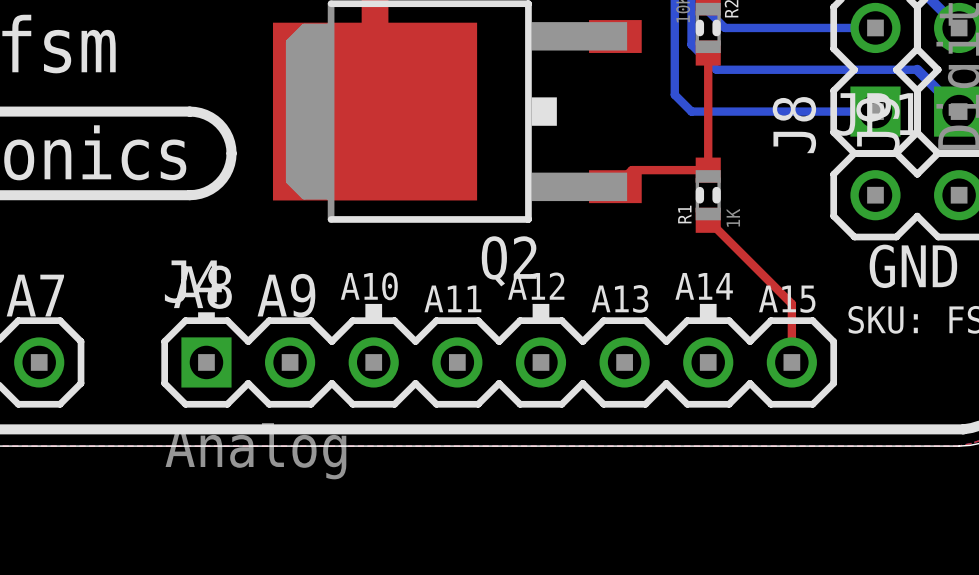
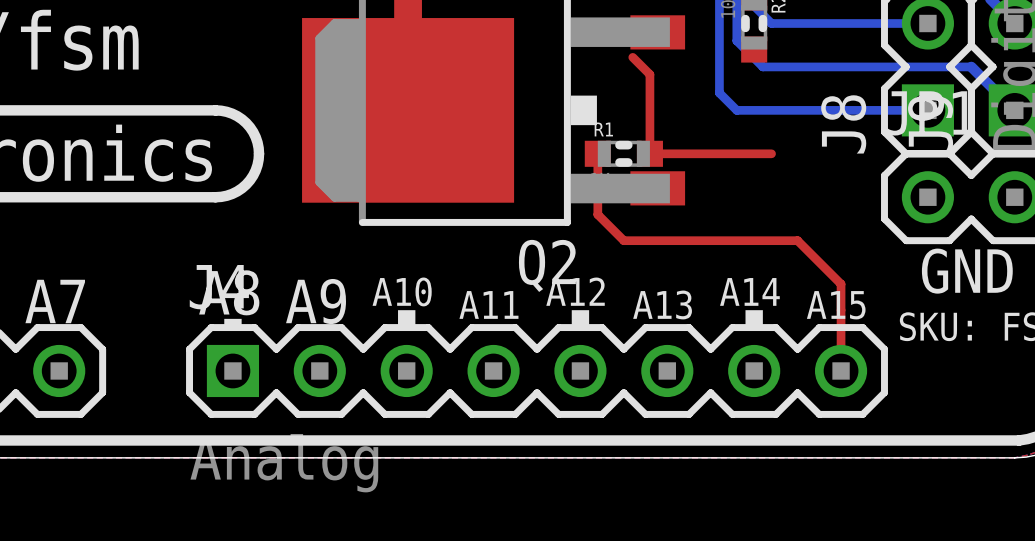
top track: (708, 53) (708, 170) (631, 170) (615, 186) -> none
top track: none -> (632, 57) (649, 74) (649, 153) (771, 153)
R1 rotation: 0° (708, 195) -> 90° clockwise (623, 153)
R1 position: (708, 195) -> (623, 153)
top track: (708, 220) (791, 303) -> (597, 153) (597, 214) (623, 240) (797, 240) (841, 284) (841, 310)

